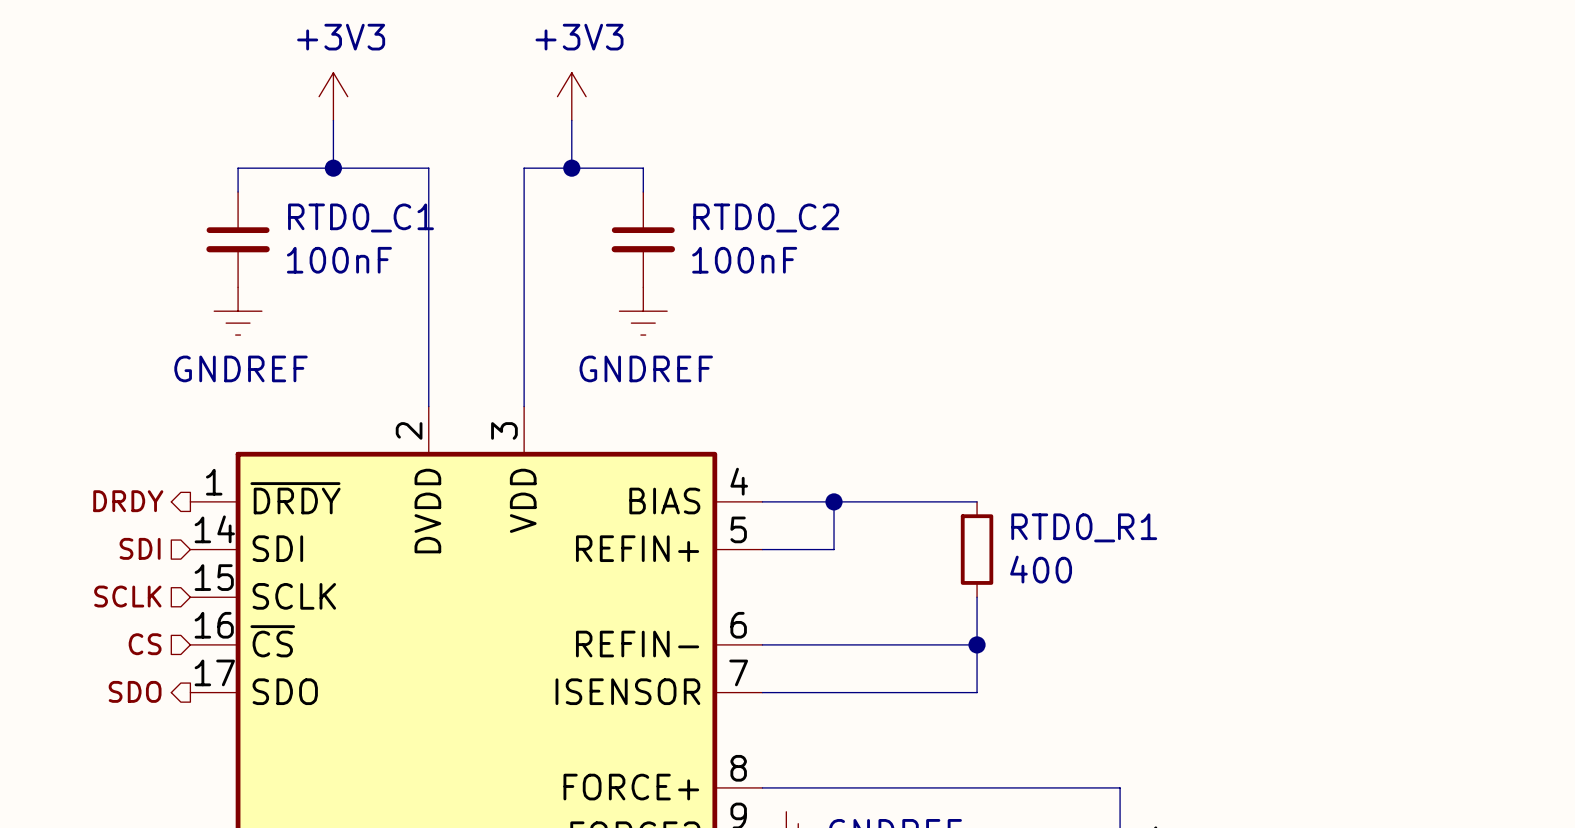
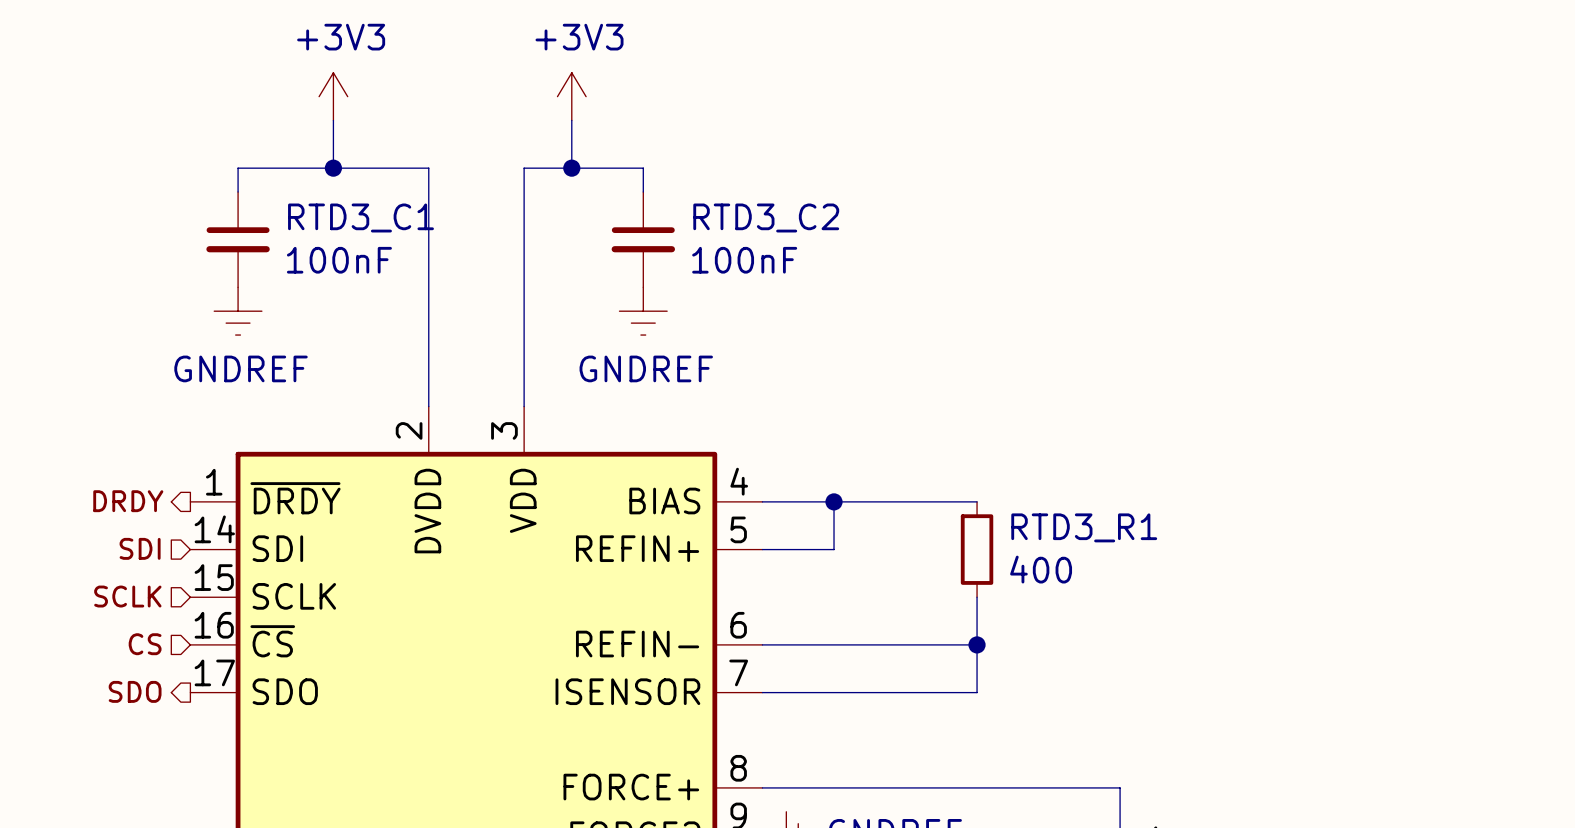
RTD0_C1 name: RTD0_C1 (360, 217) -> RTD3_C1 (360, 217)
RTD0_C2 name: RTD0_C2 (766, 217) -> RTD3_C2 (766, 217)
RTD0_R1 name: RTD0_R1 (1084, 527) -> RTD3_R1 (1084, 527)

